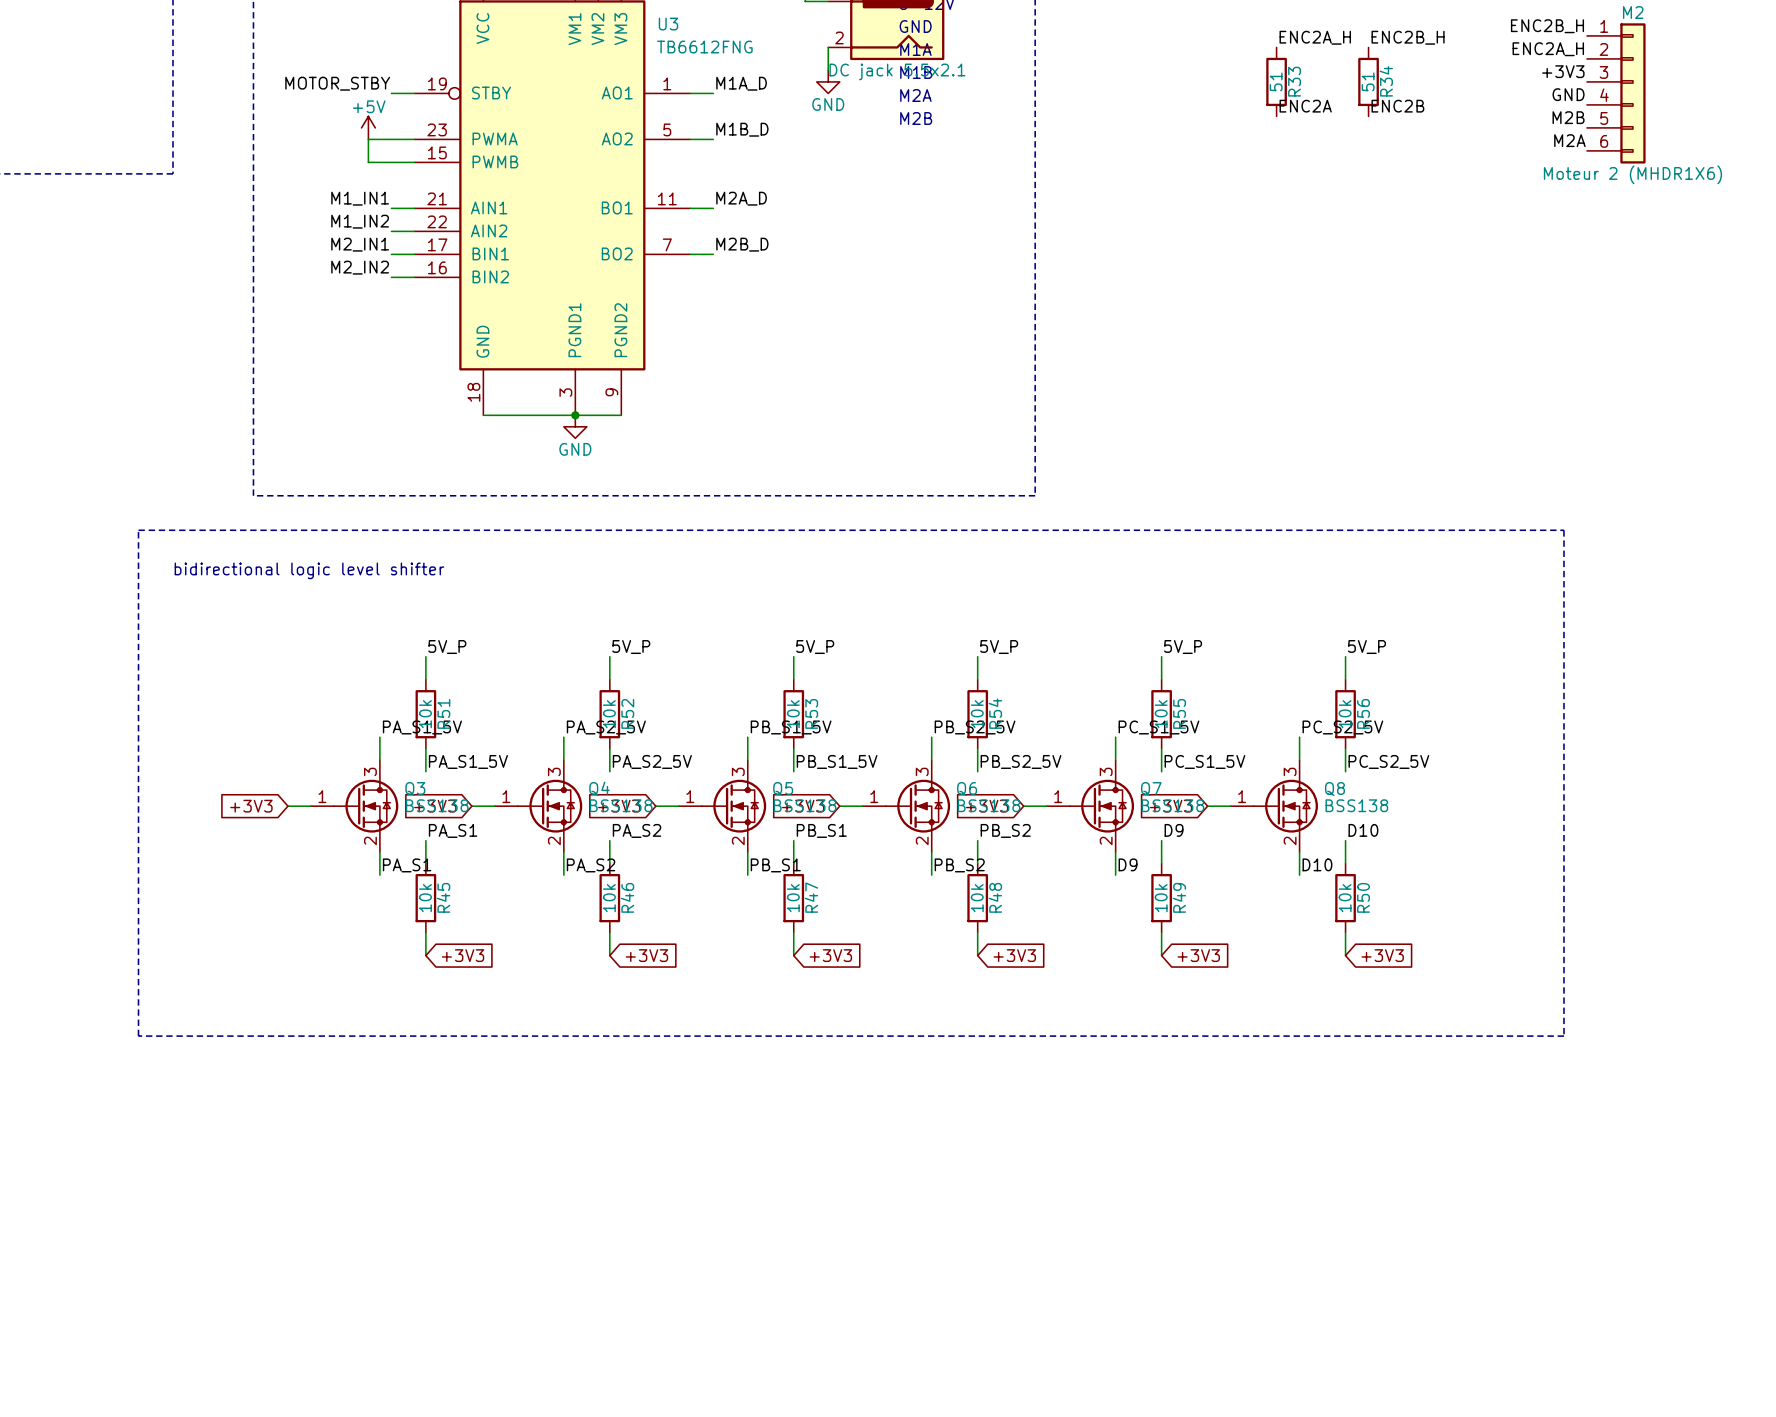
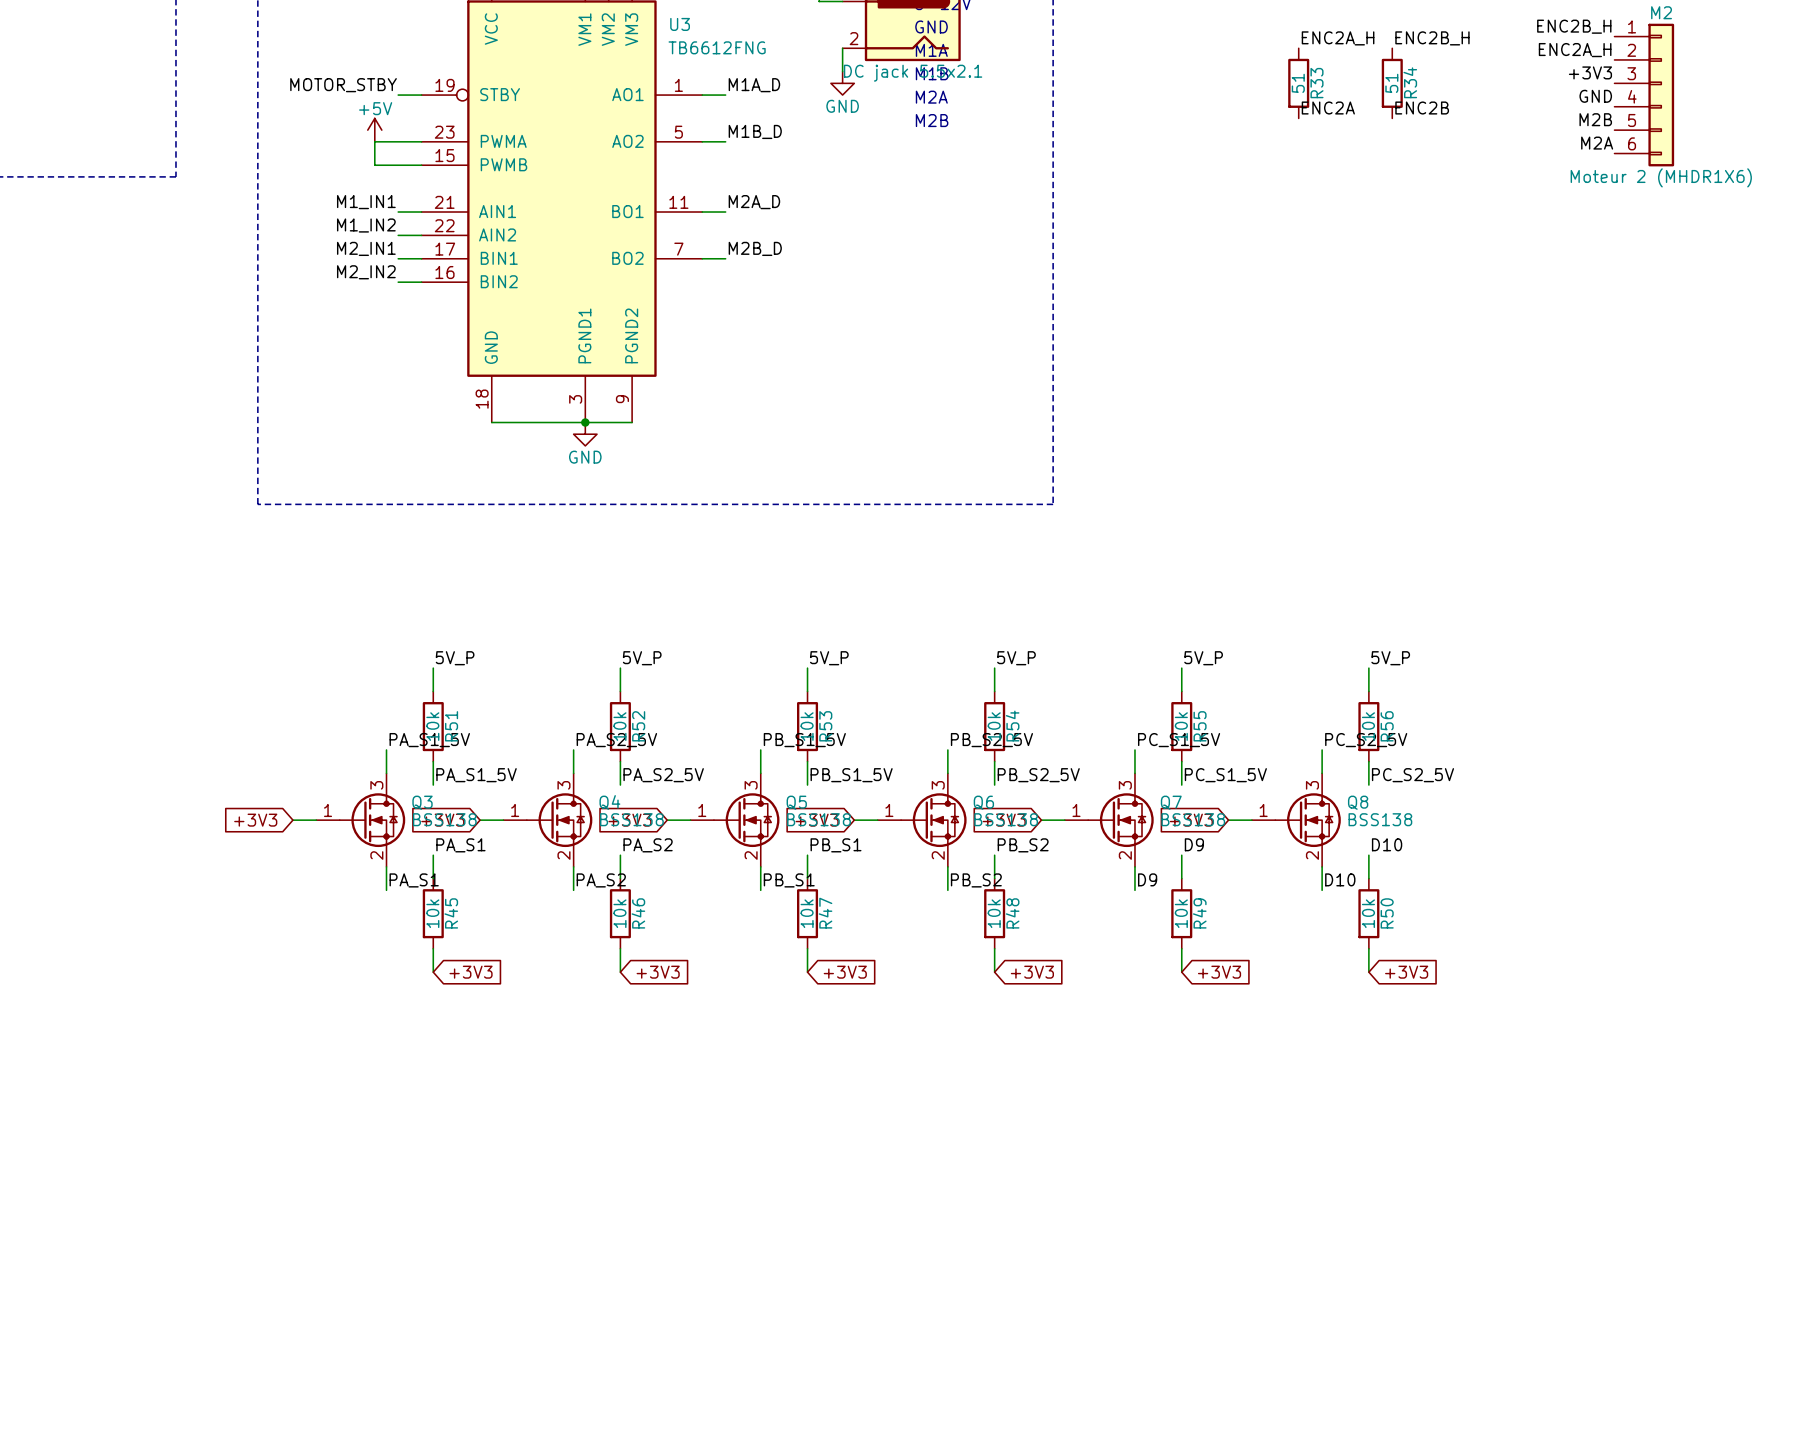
line: (138, 530) (1563, 530) (1563, 1036) (138, 1036) (138, 530) -> none
text: bidirectional logic level shifter (309, 570) -> none

